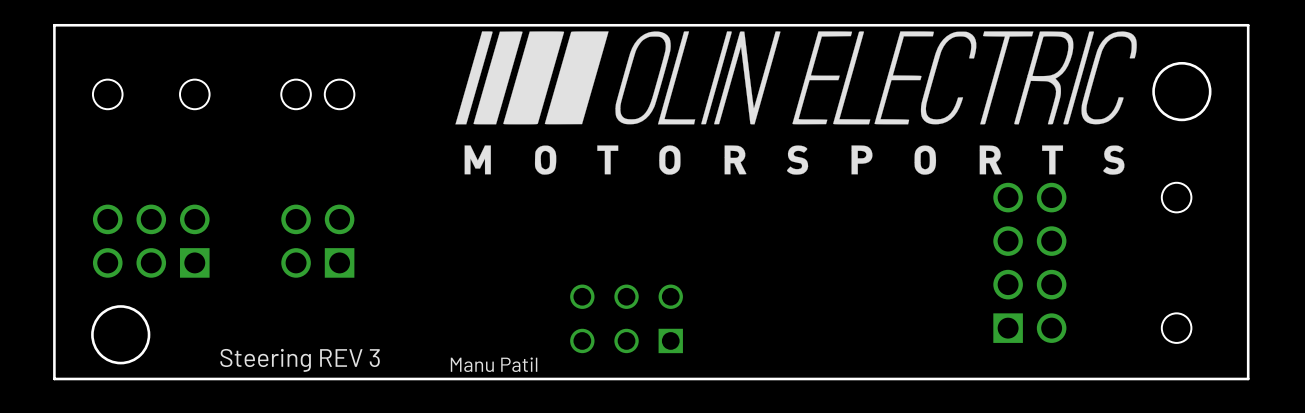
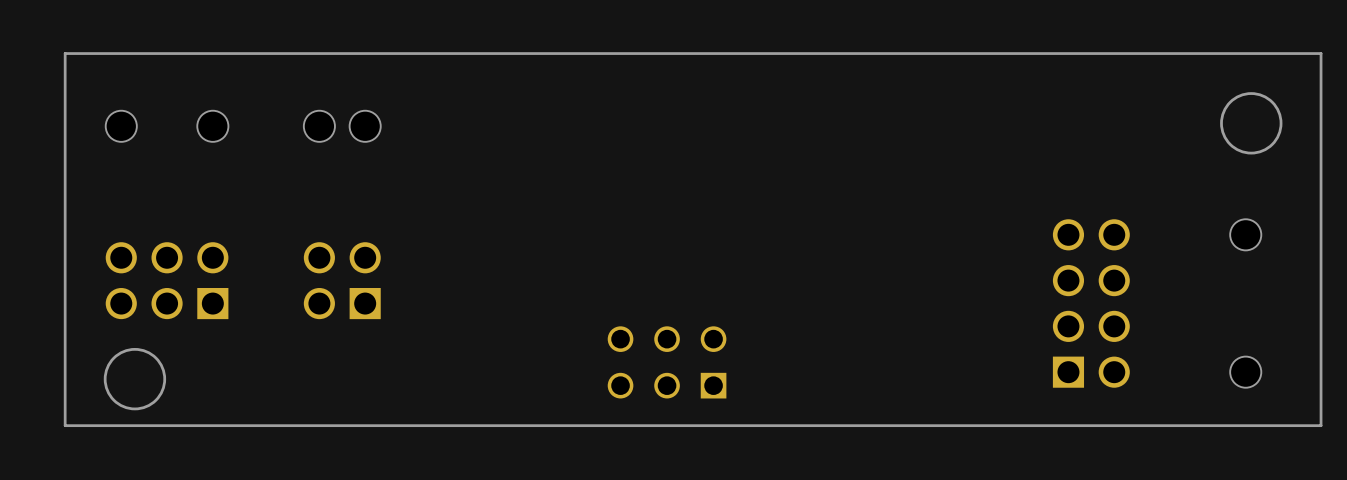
drawing: [455, 31, 1137, 175] -> none
text: Steering REV 3 (300, 360) -> none
text: Manu Patil (494, 364) -> none

